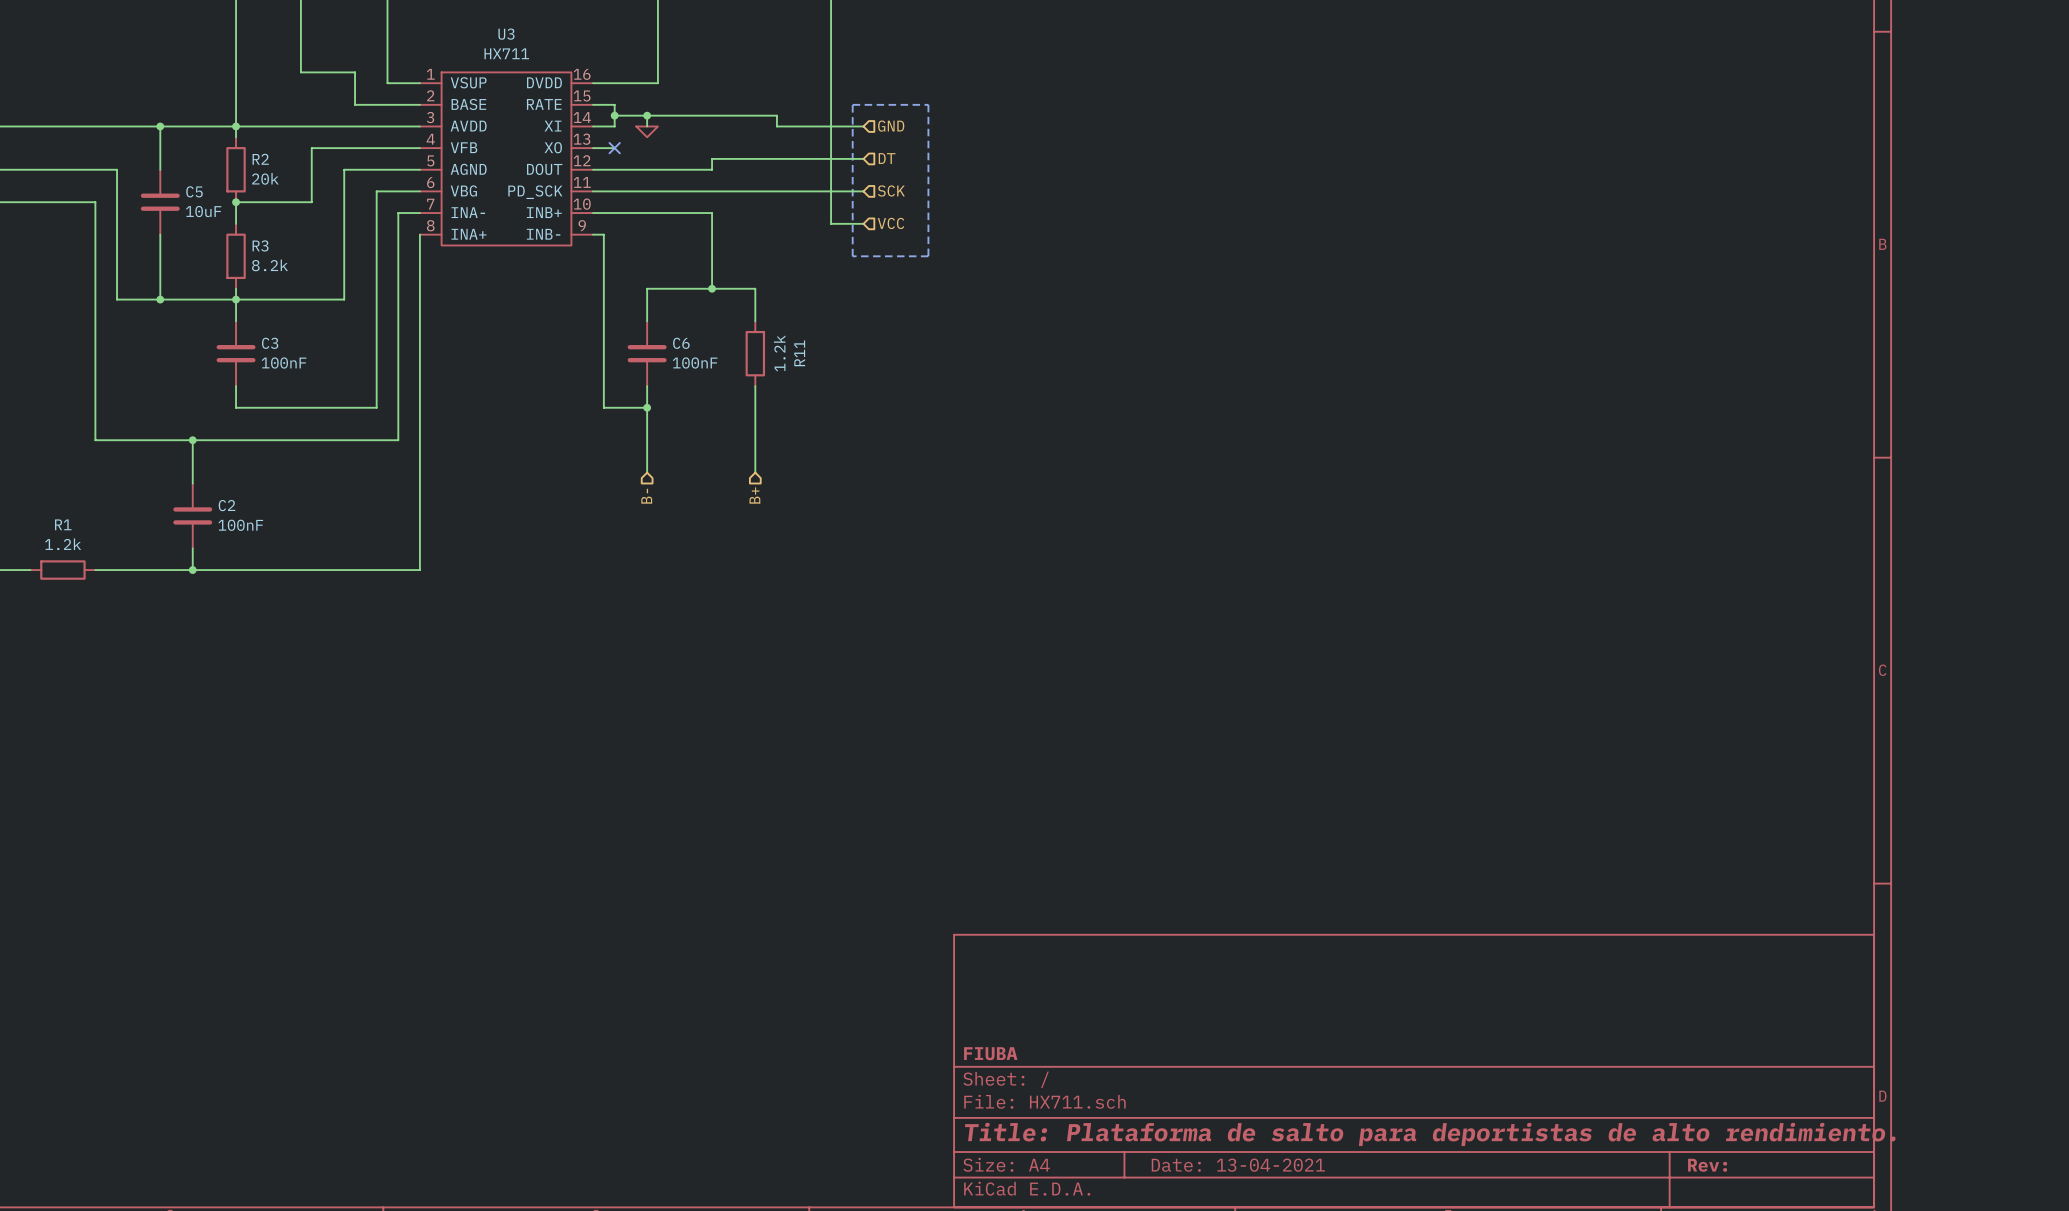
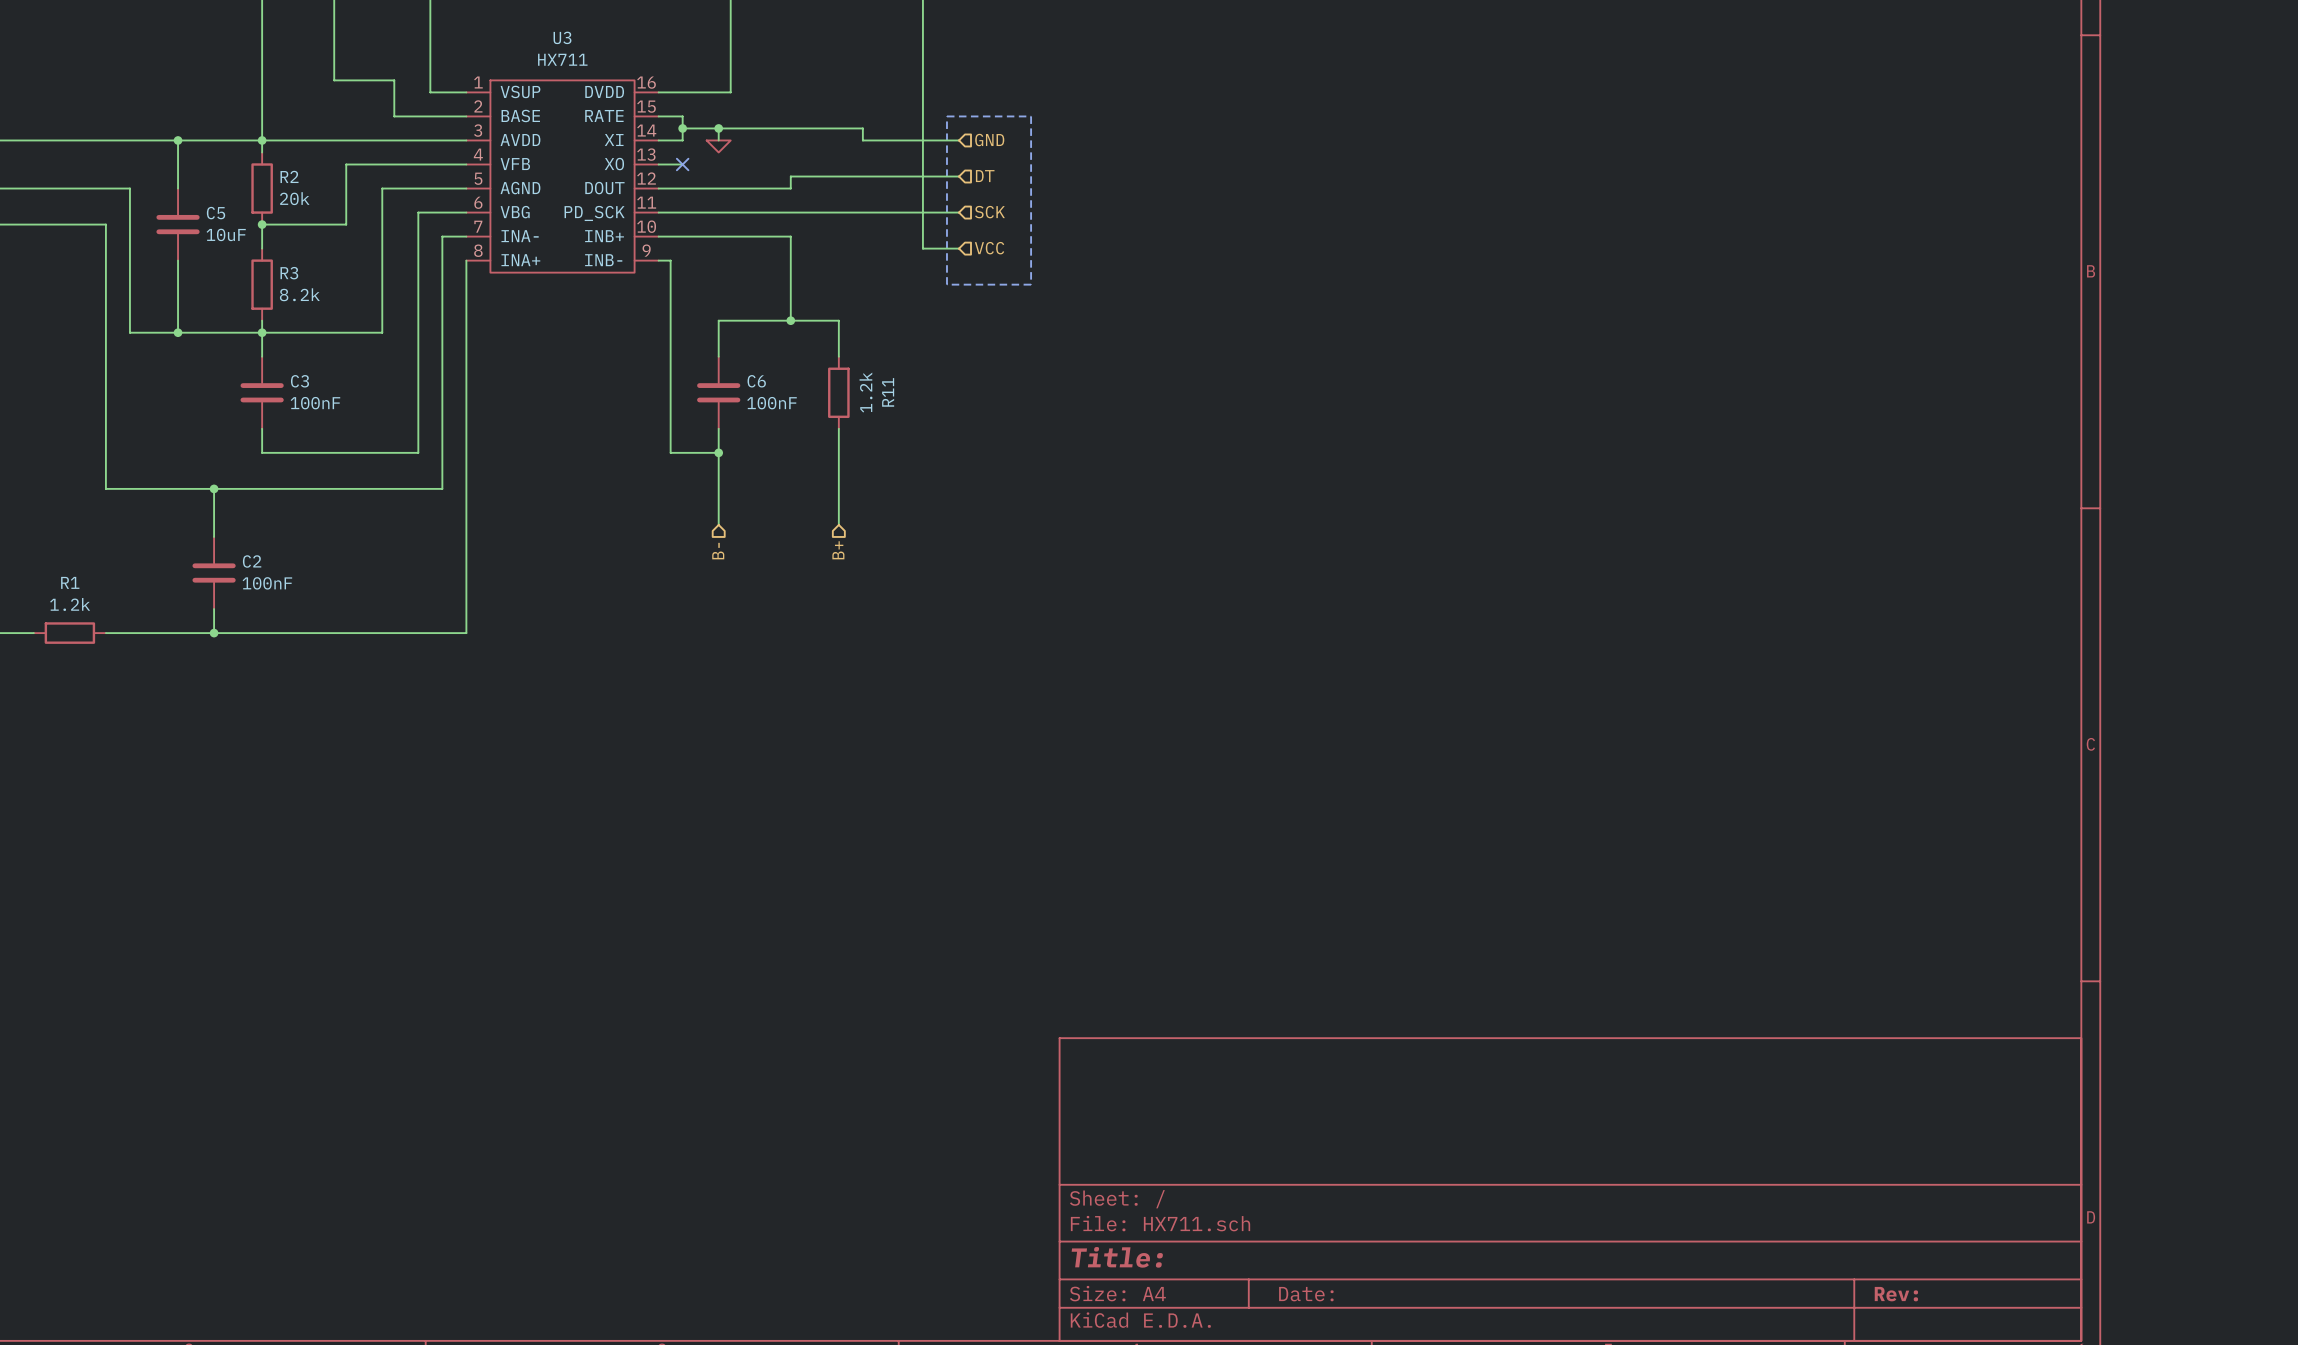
title block: FIUBA (990, 1053) -> none
title block: Title: Plataforma de salto para deportistas de alto rendimiento. (1430, 1134) -> Title: (1117, 1257)
title block: Date: 13-04-2021 (1238, 1165) -> Date: (1306, 1294)

